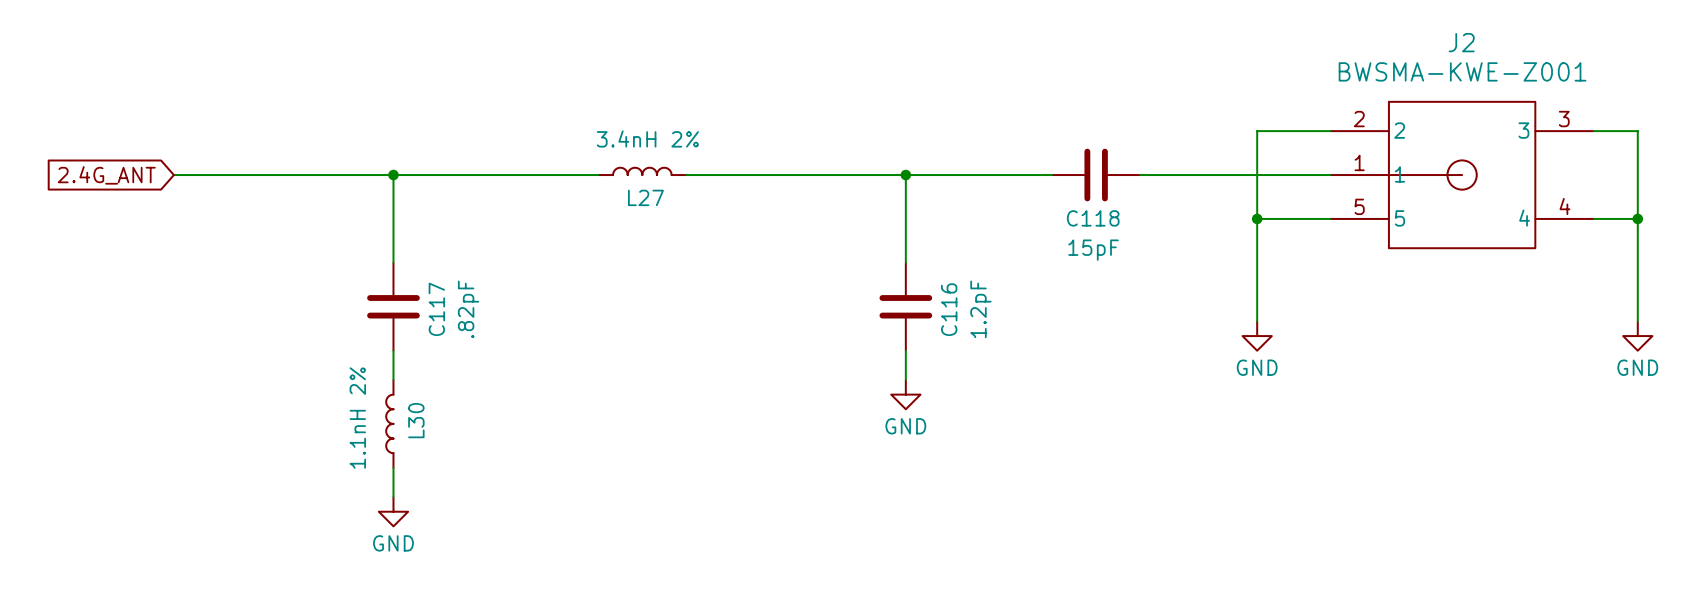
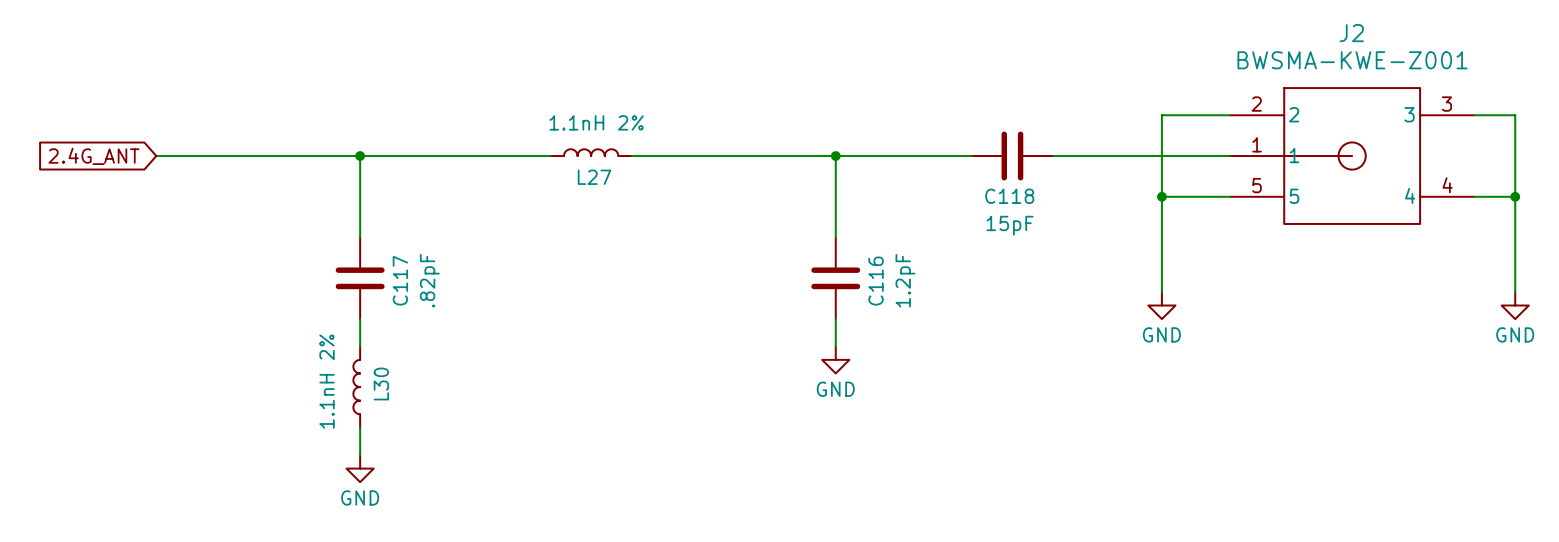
L27 value: 3.4nH 2% (647, 139) -> 1.1nH 2% (596, 122)

